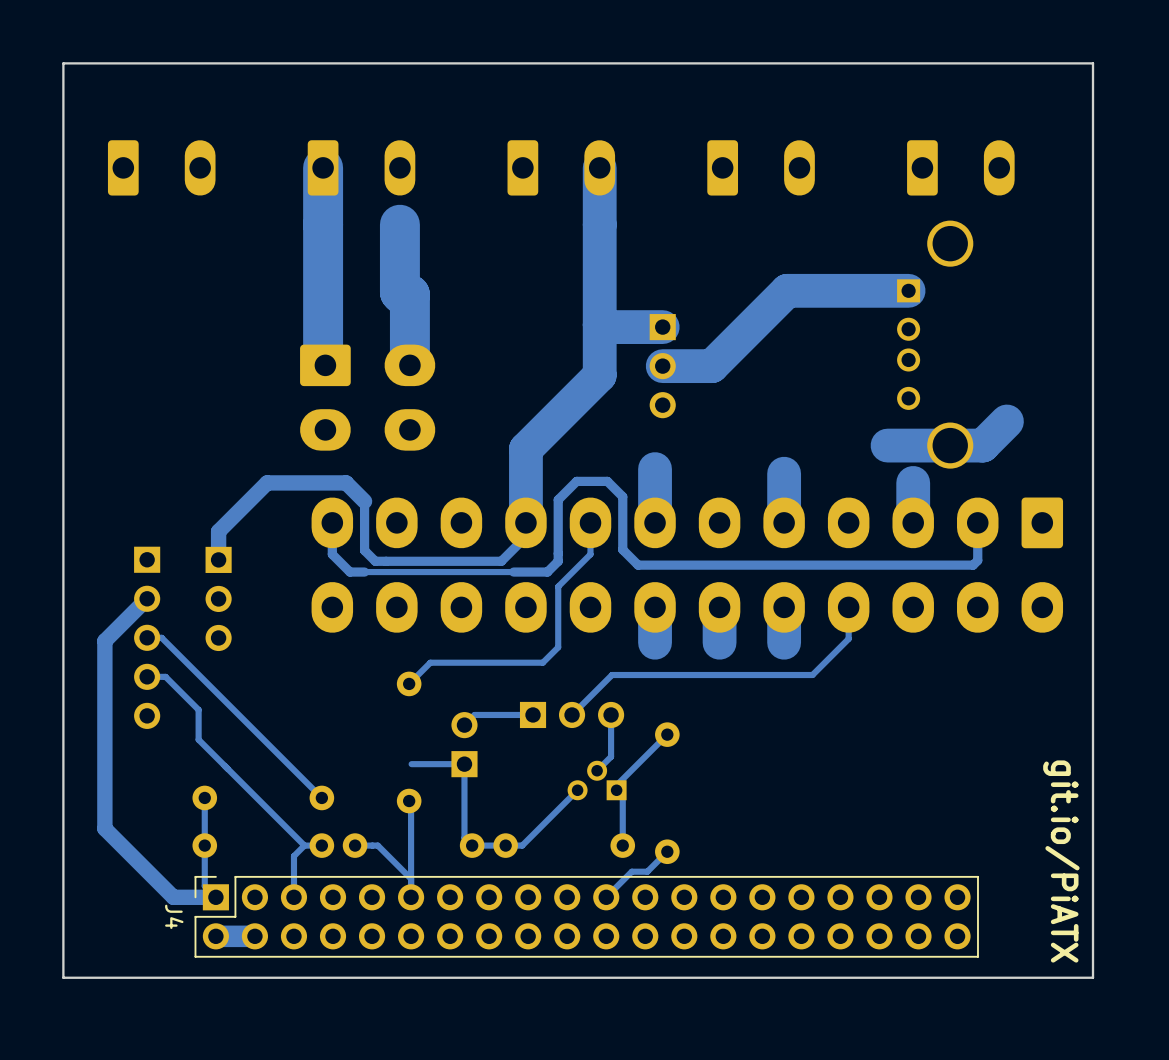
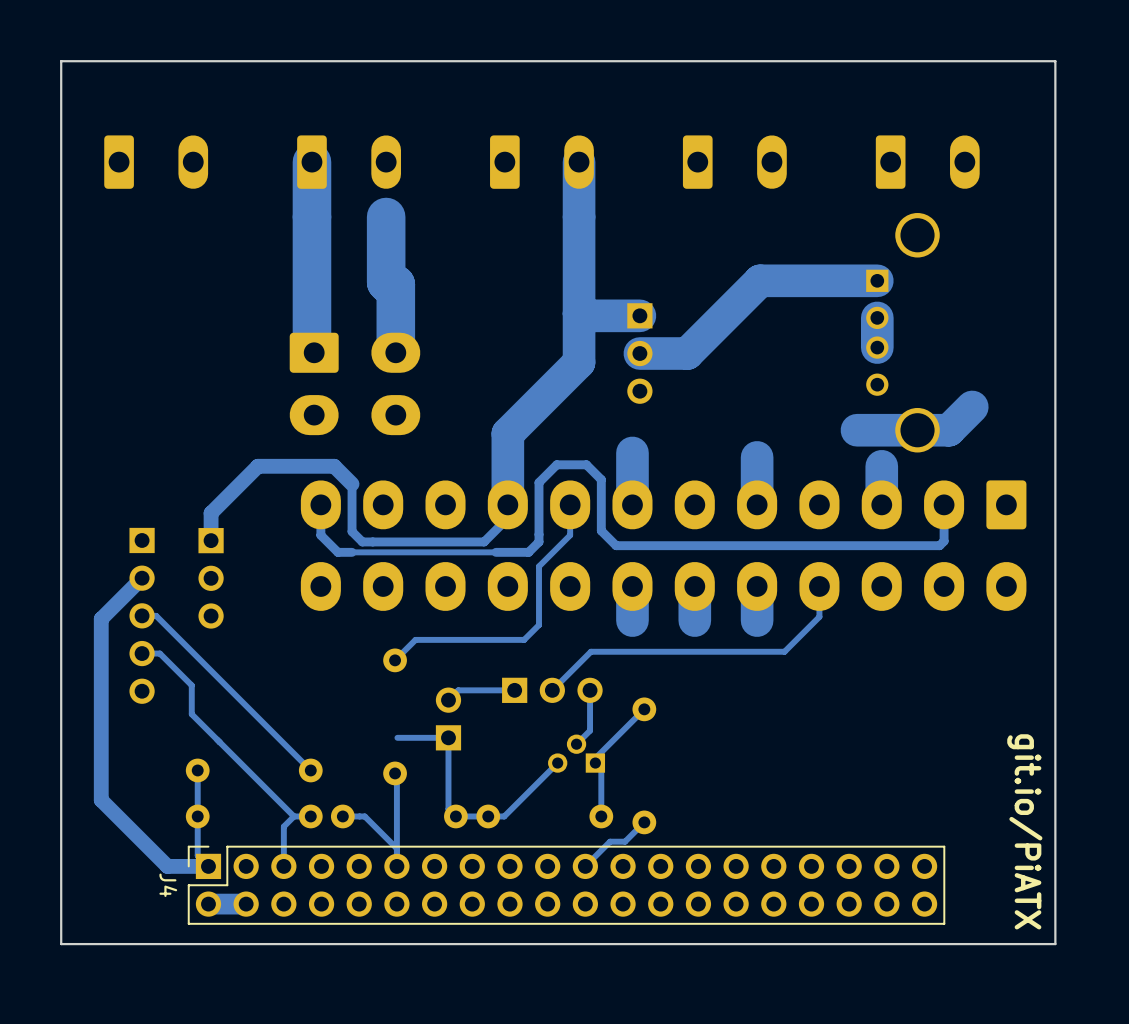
track: none -> (877, 317) (877, 347)

